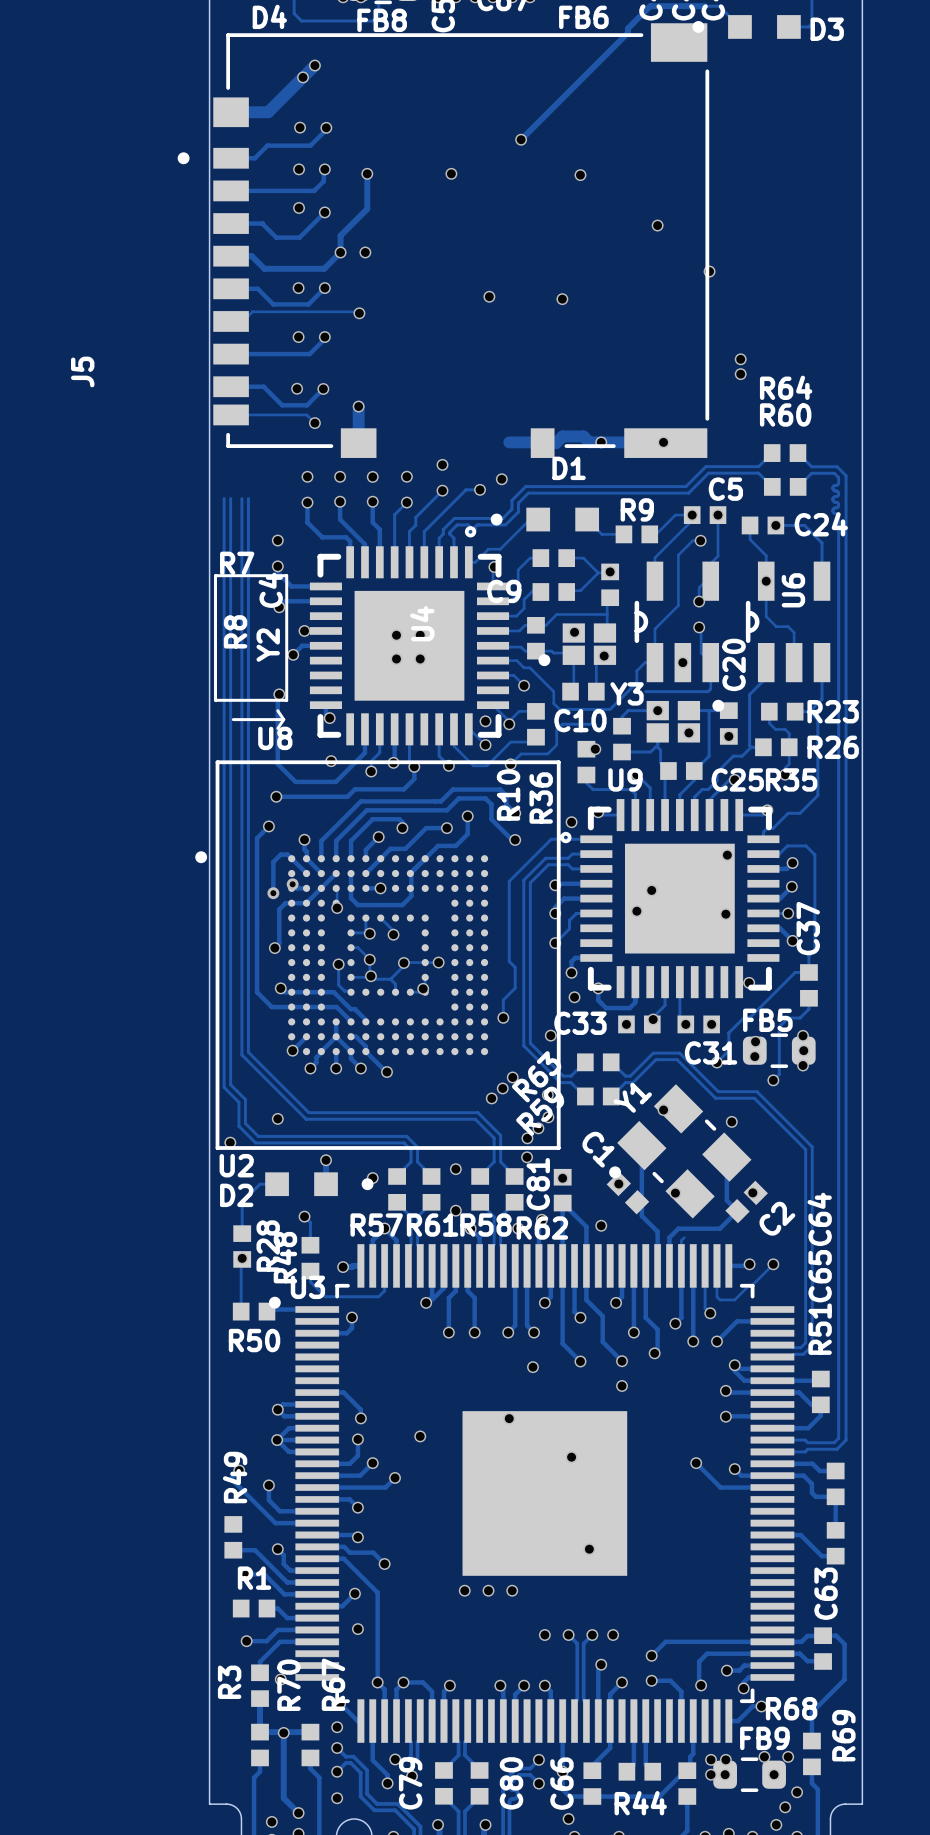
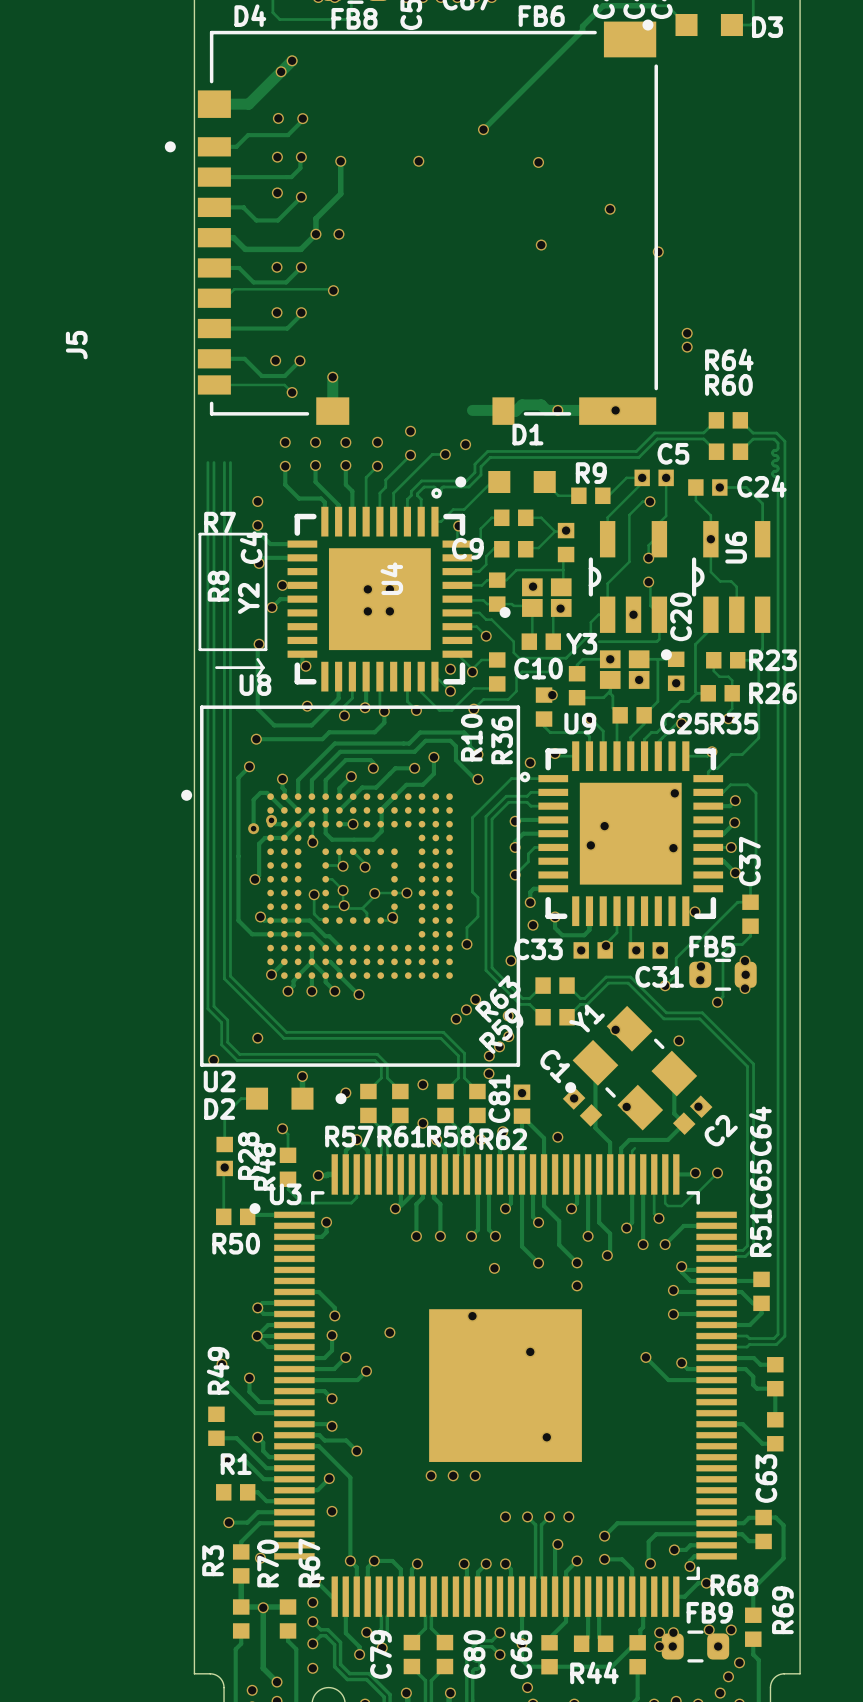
via: (489, 296) -> none
via position: (562, 299) -> (541, 245)

